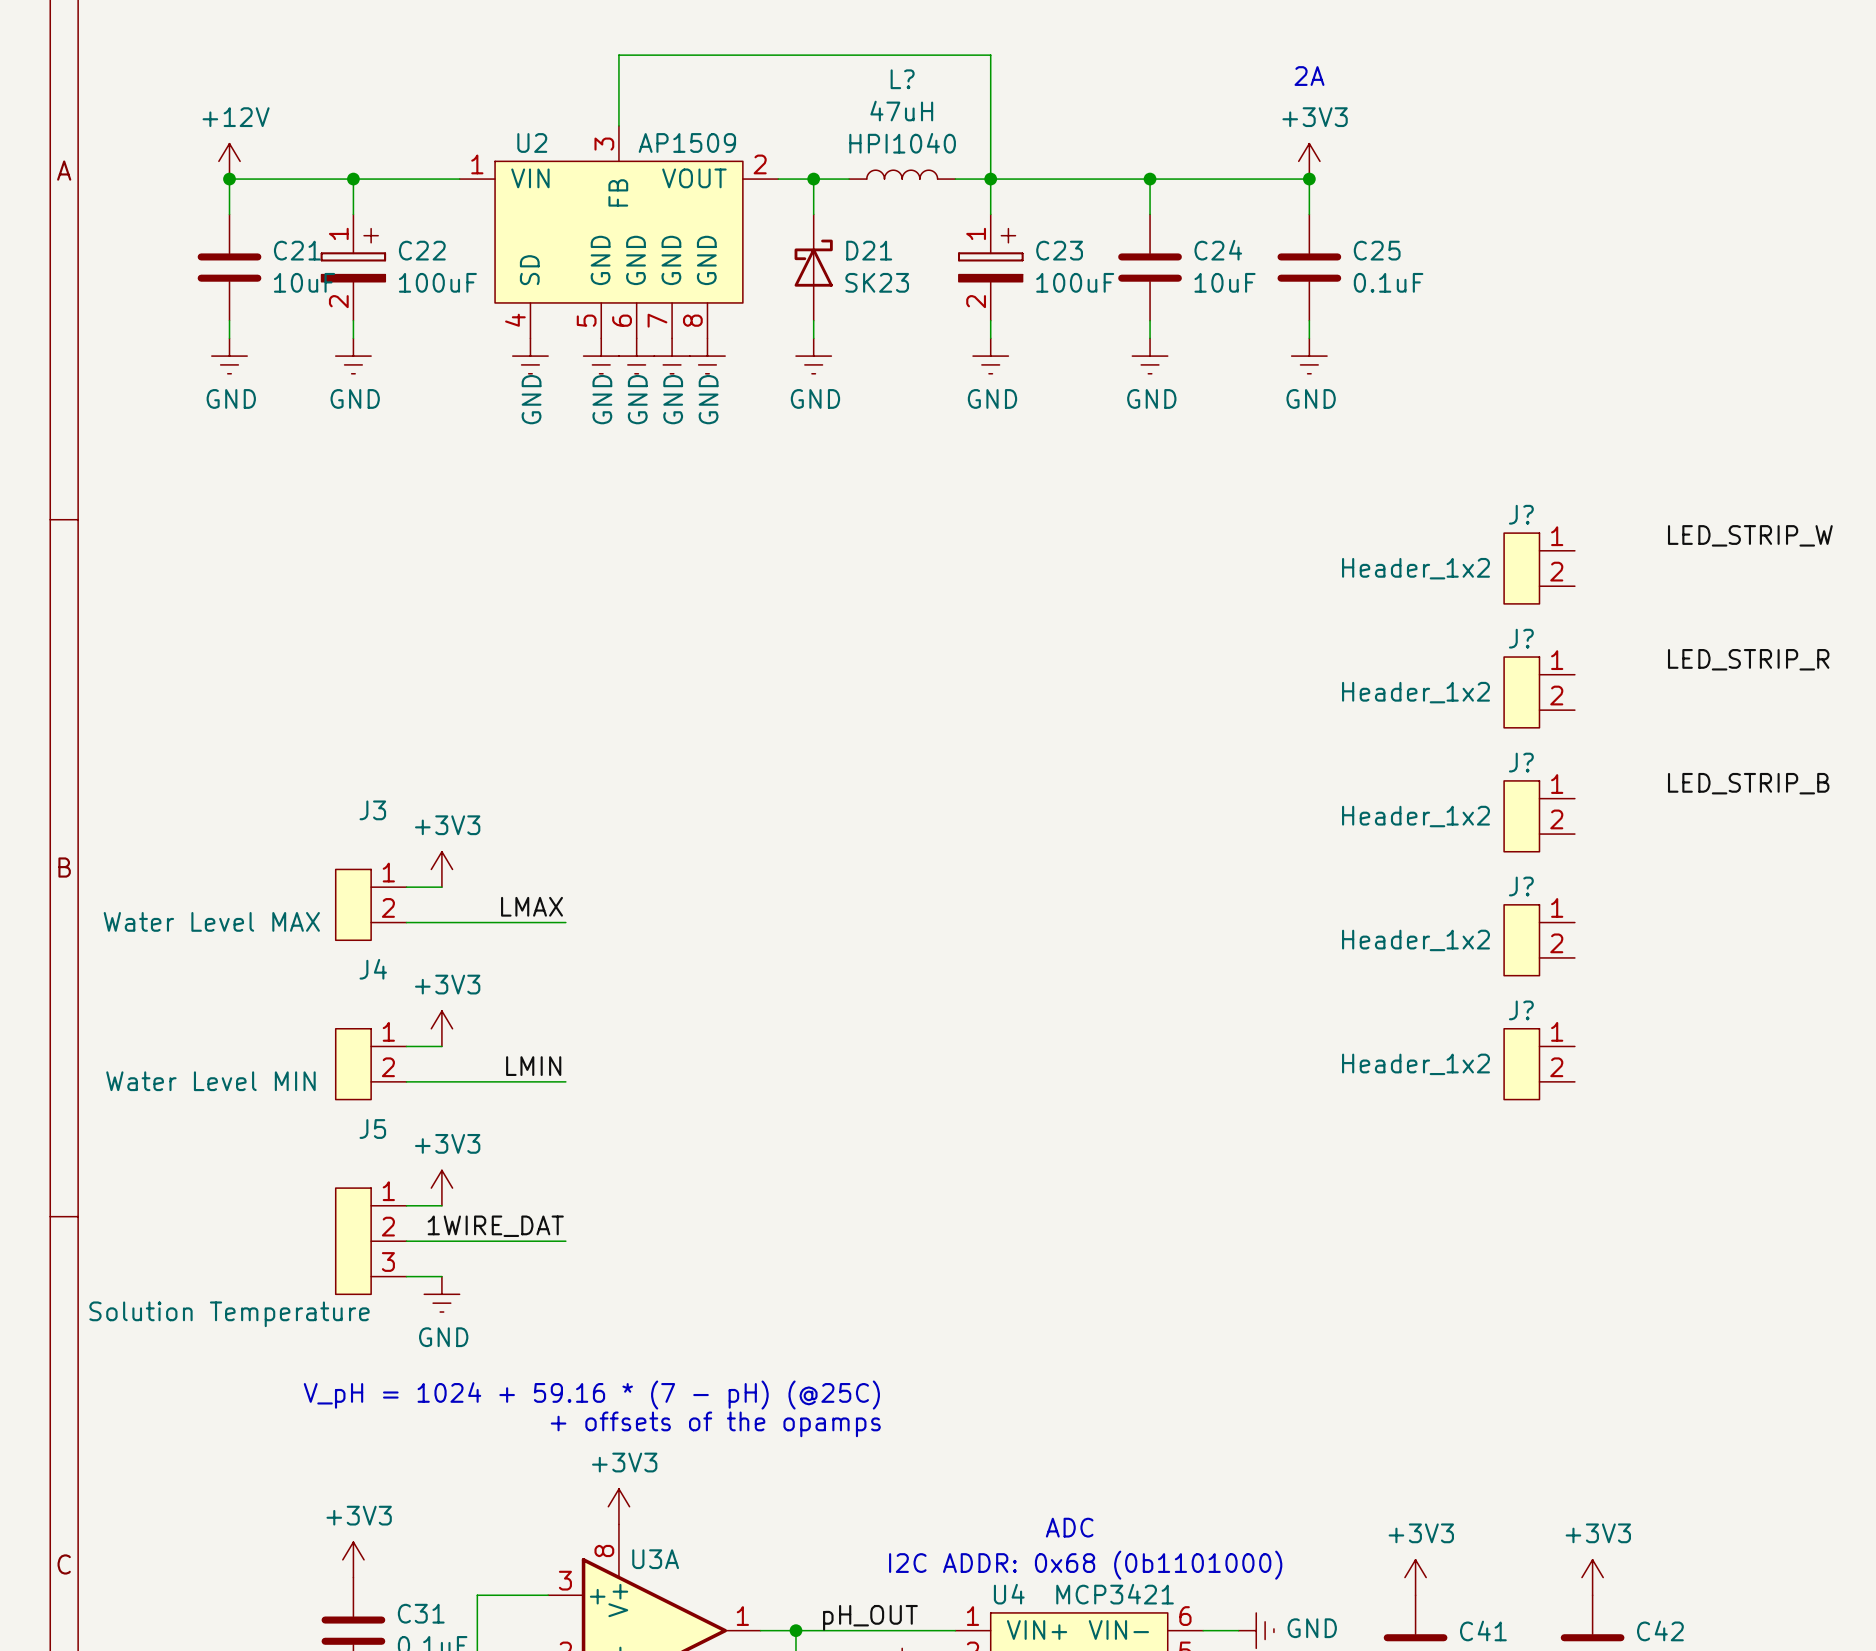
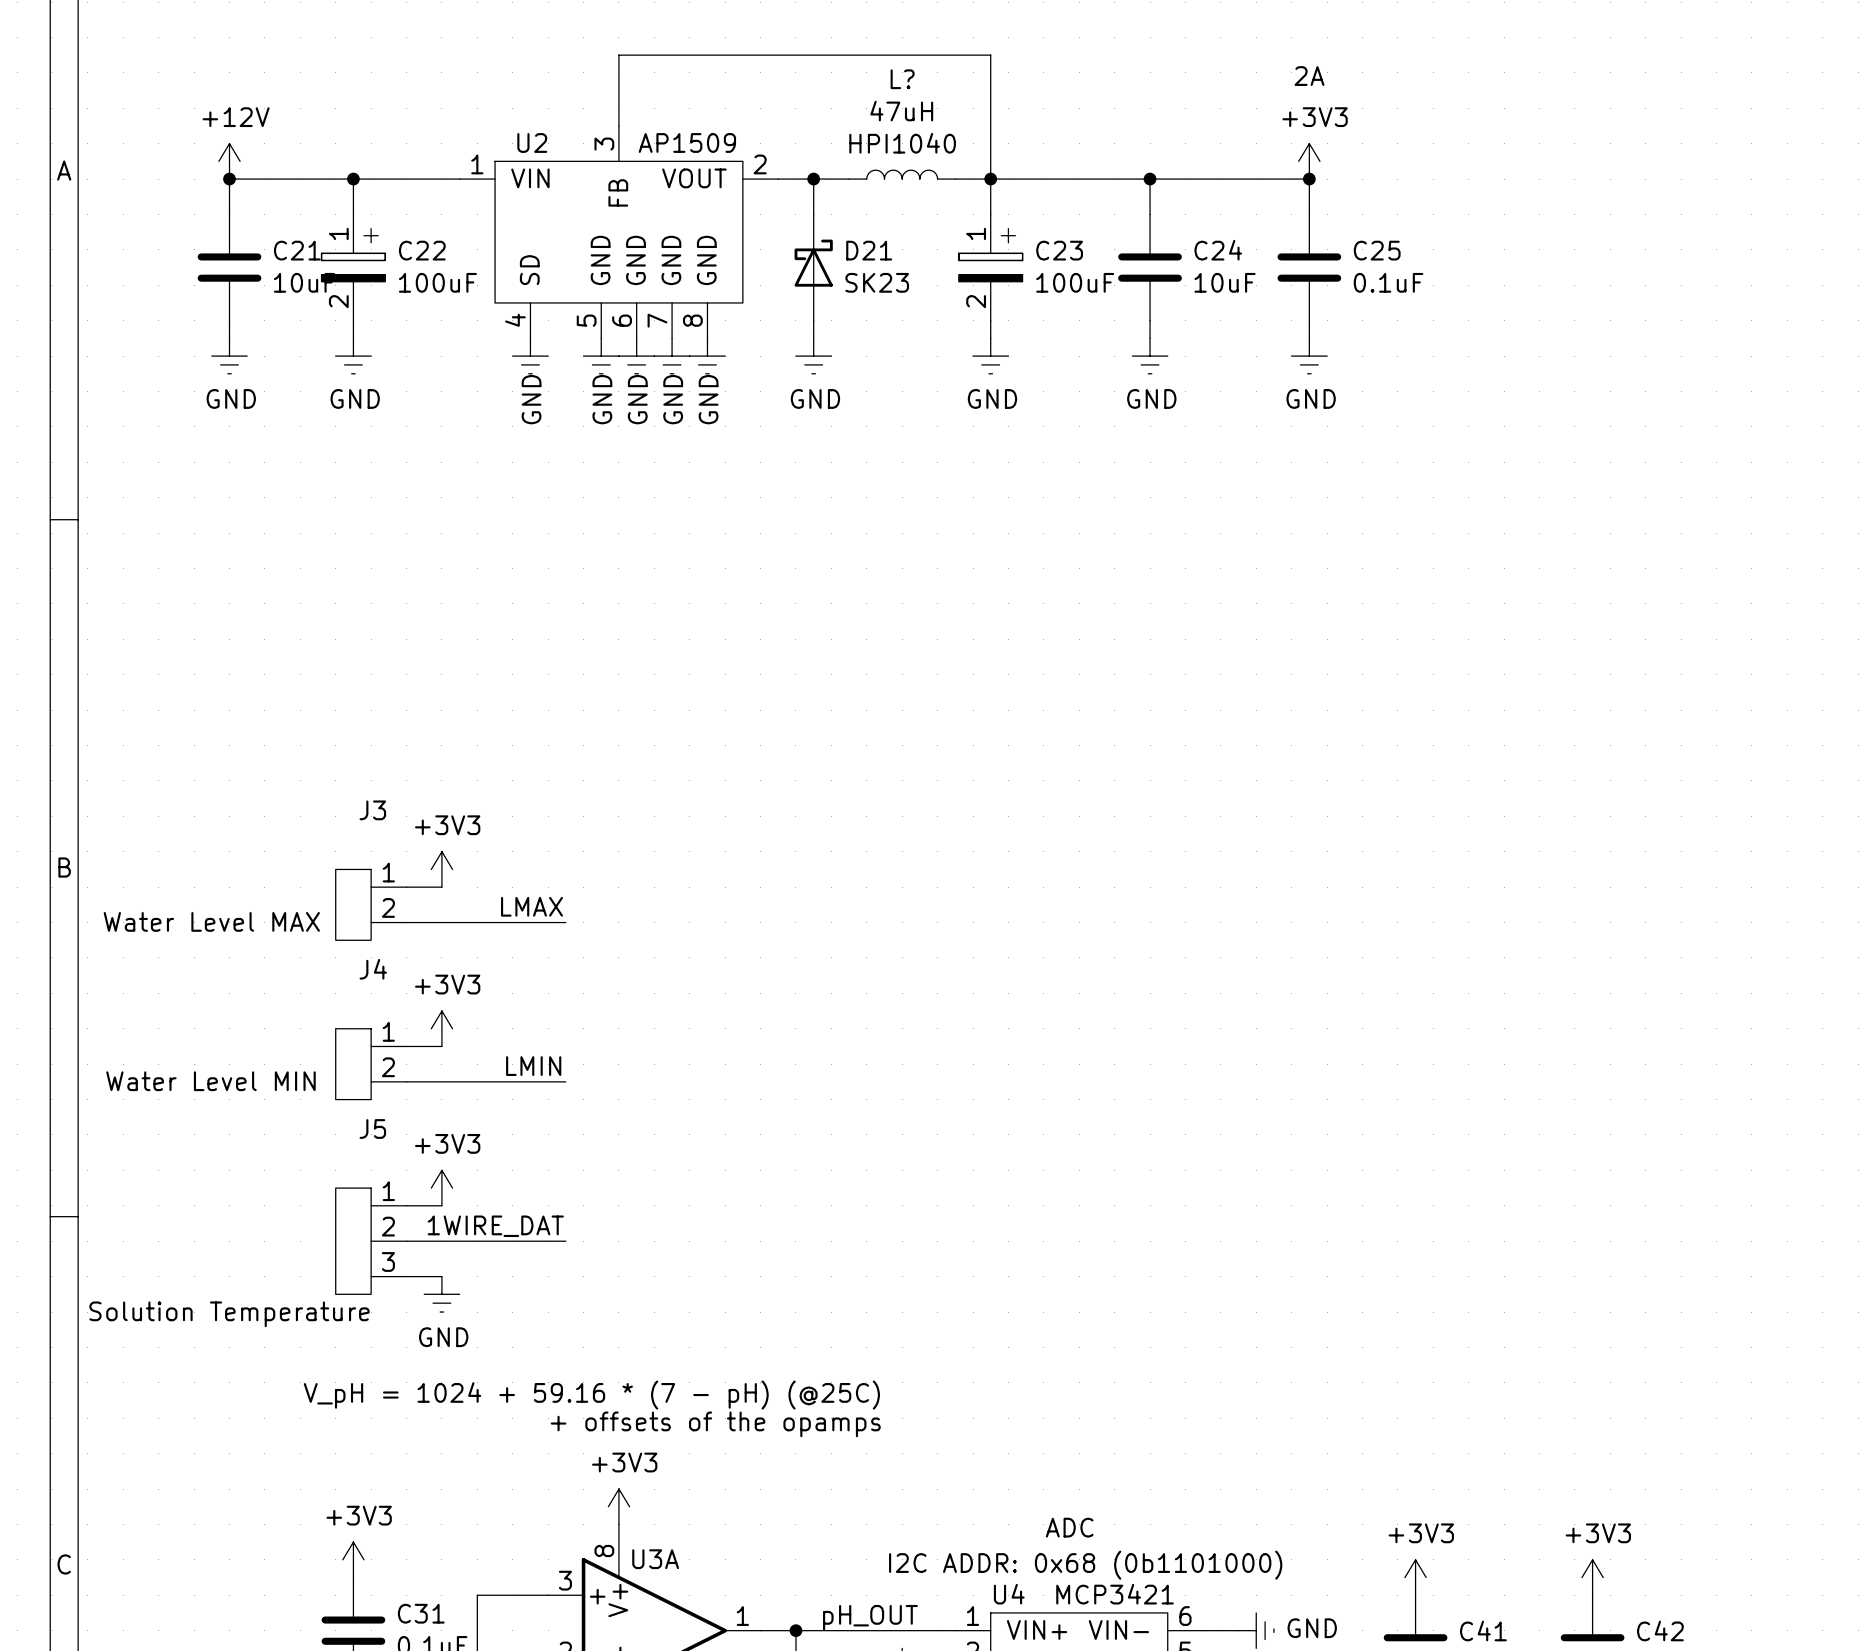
label: LED_STRIP_W (1750, 535) -> none
J?: Header_1x2 (1539, 568) -> none
label: LED_STRIP_R (1748, 659) -> none
J?: Header_1x2 (1539, 692) -> none
label: LED_STRIP_B (1748, 783) -> none
J?: Header_1x2 (1539, 816) -> none
J?: Header_1x2 (1539, 940) -> none
J?: Header_1x2 (1539, 1064) -> none

